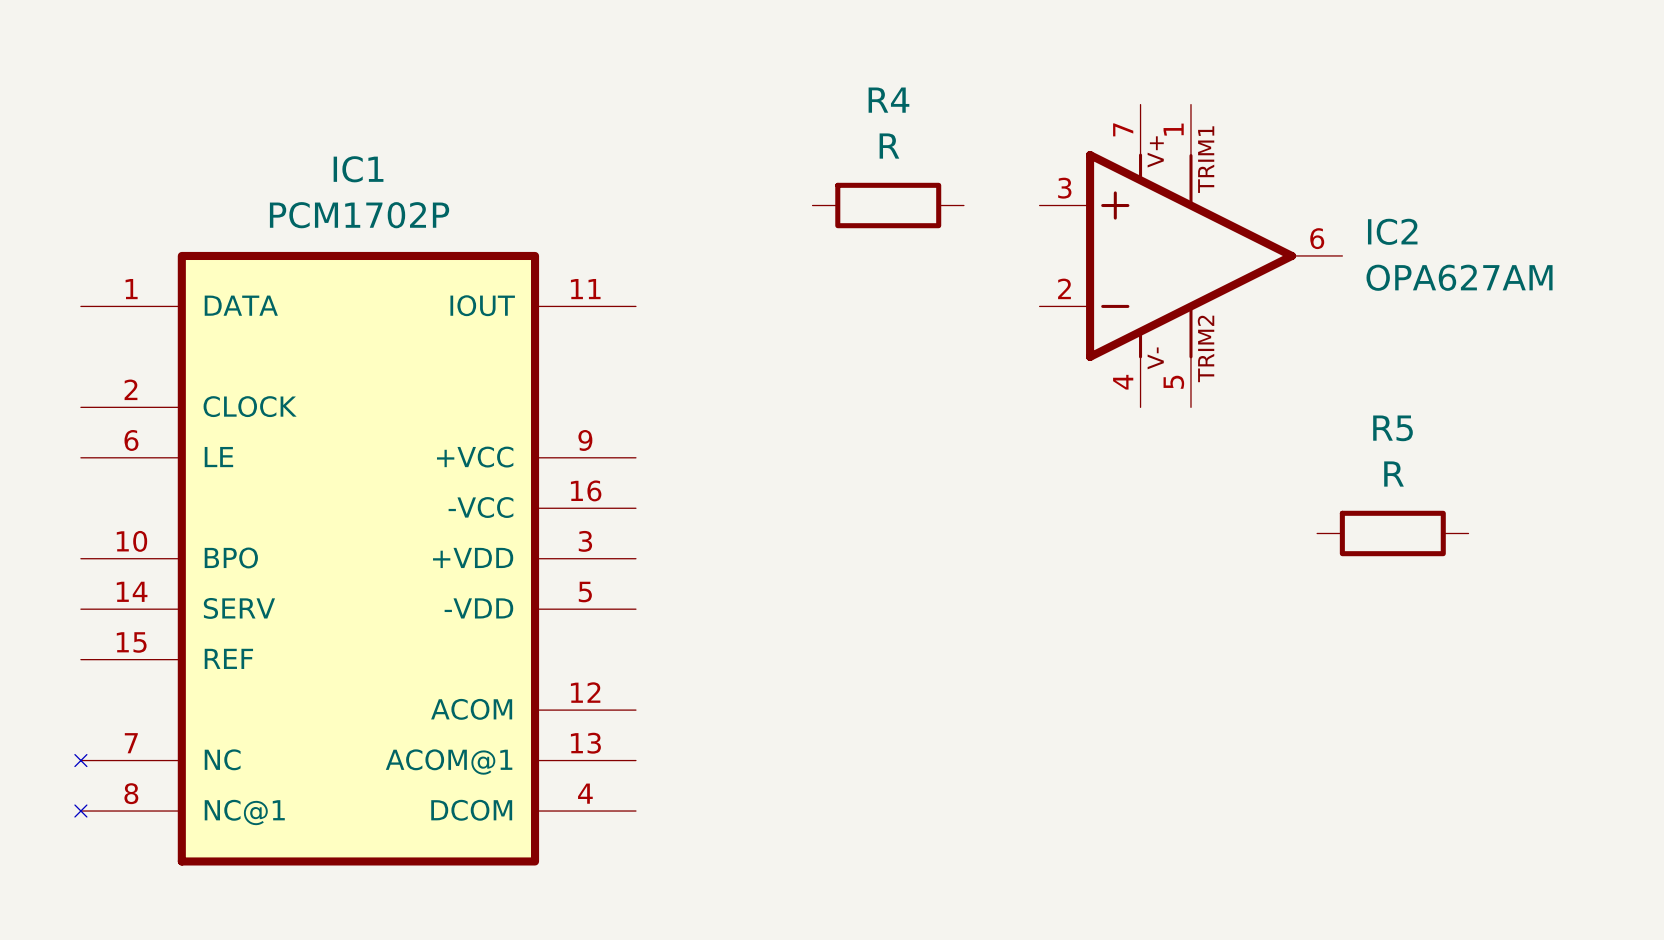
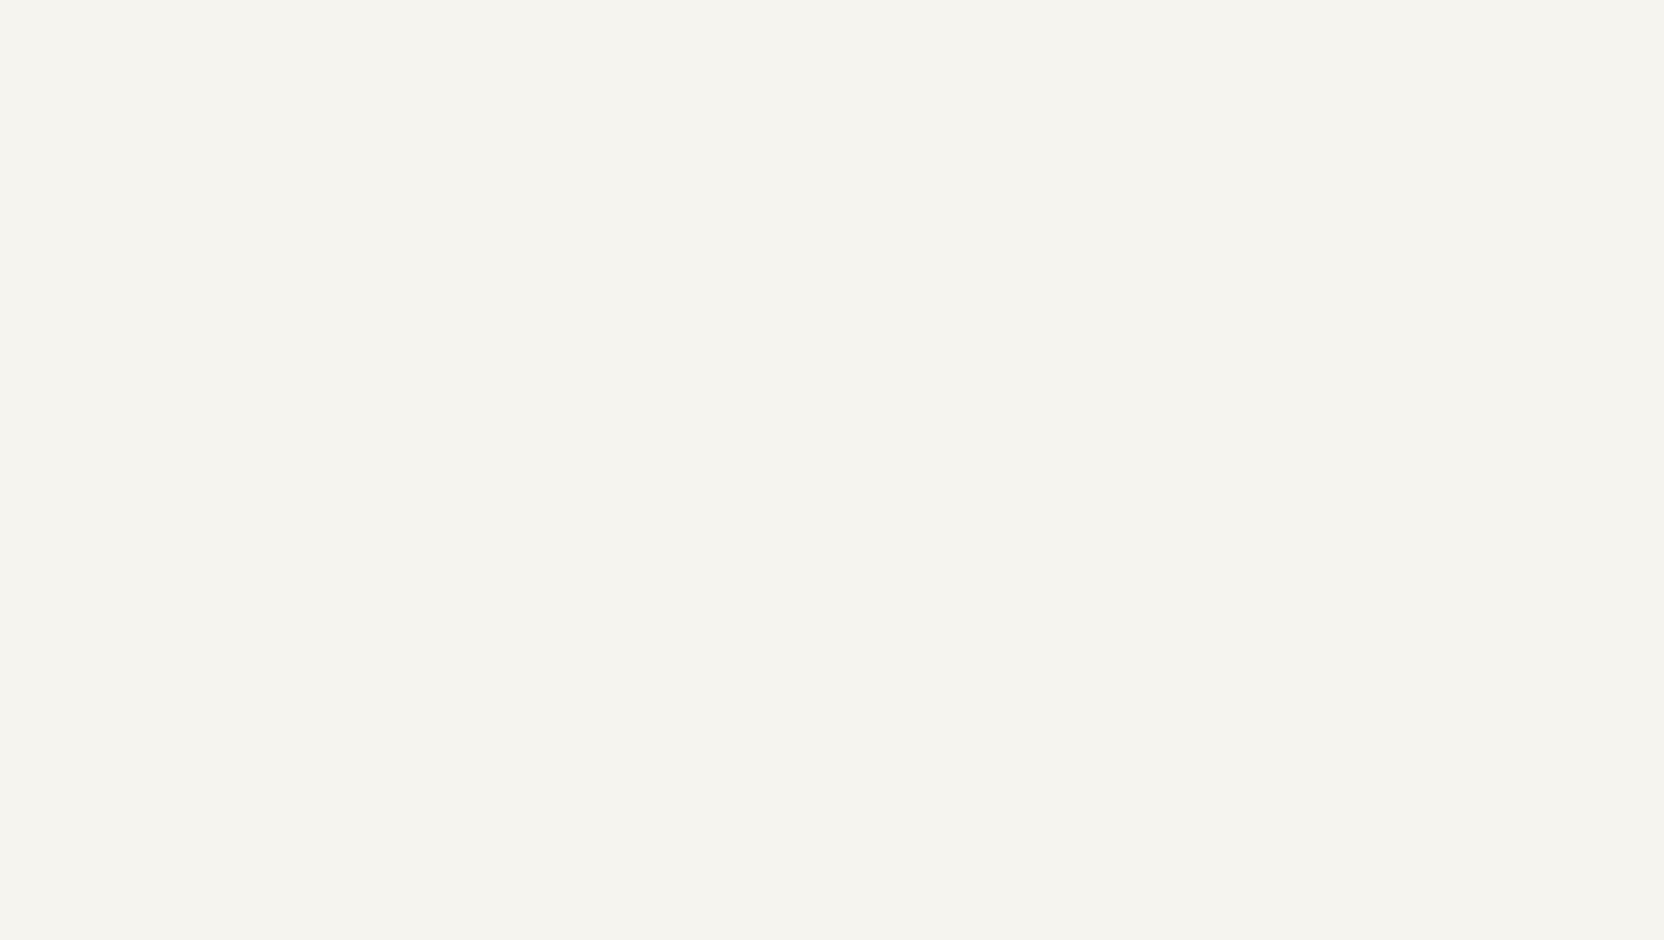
R4: R (888, 205) -> none
IC2: OPA627AM (1190, 255) -> none
R5: R (1392, 533) -> none
IC1: PCM1702P (355, 558) -> none

